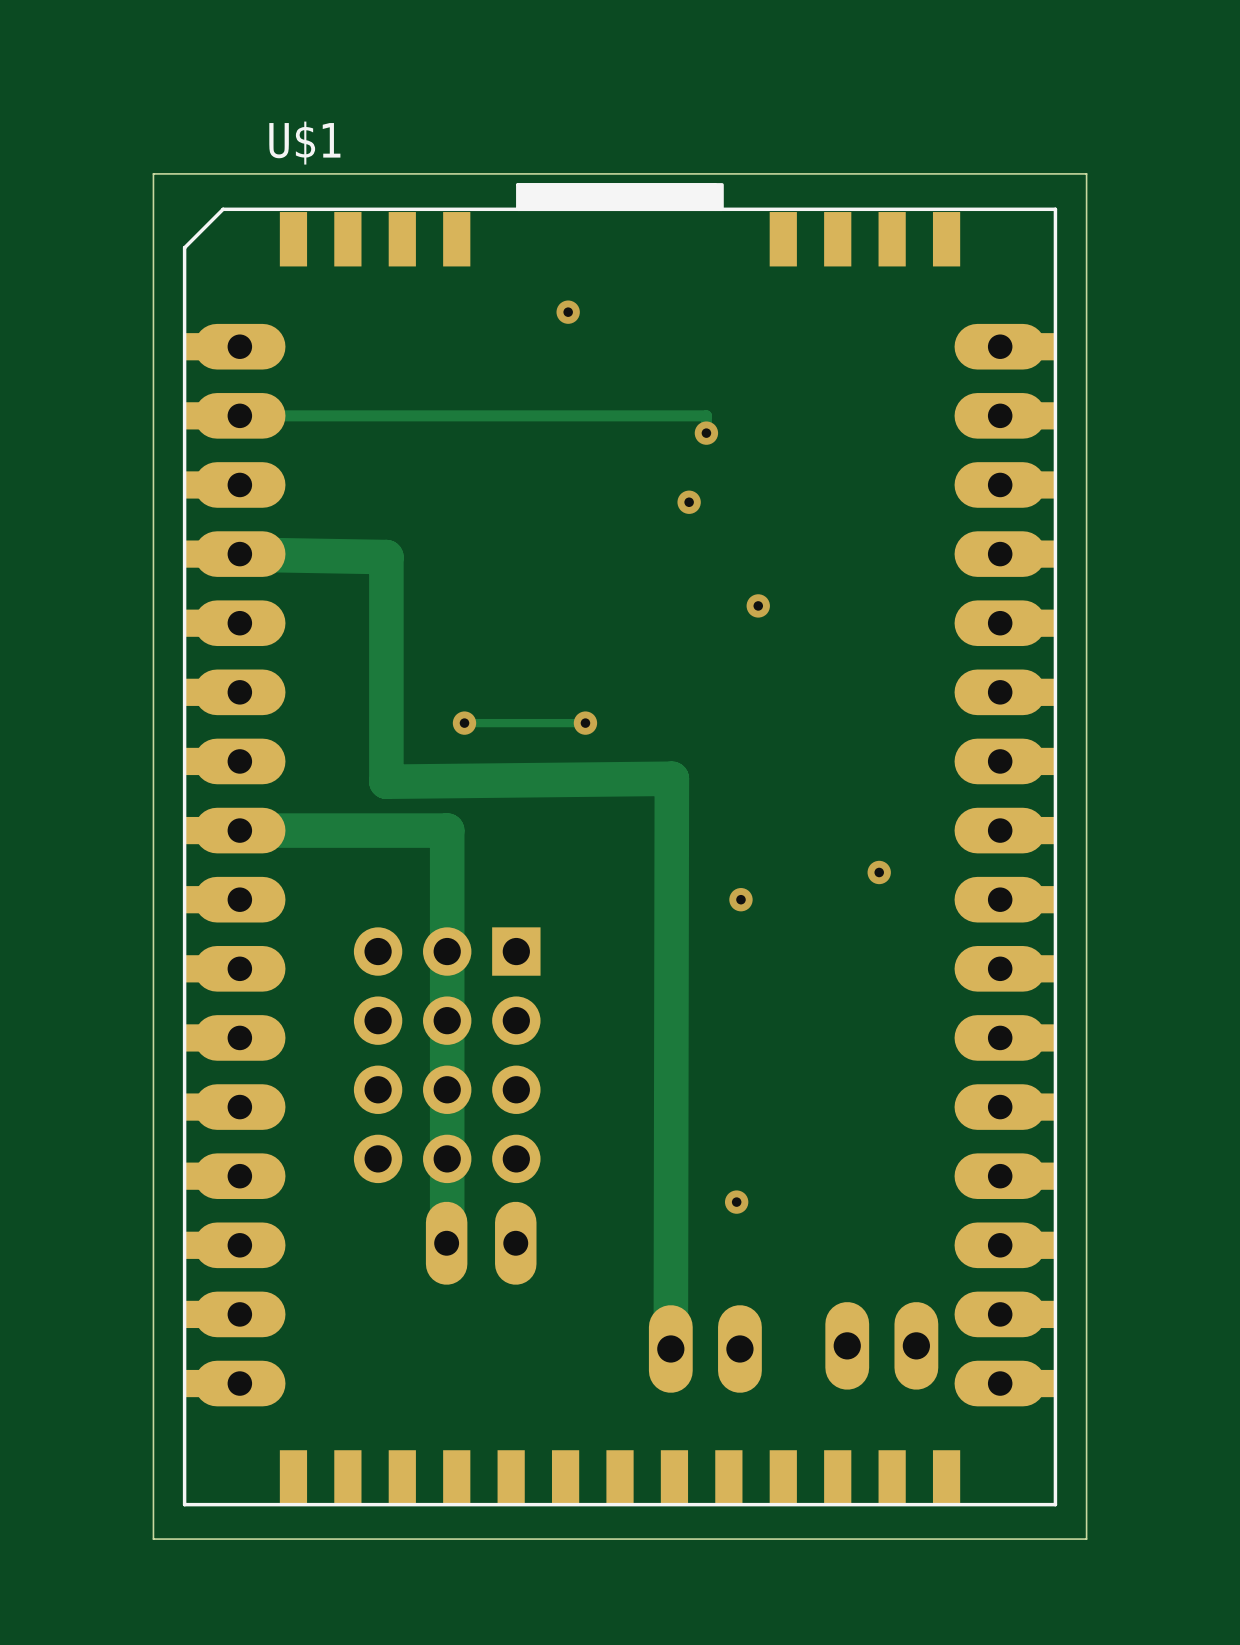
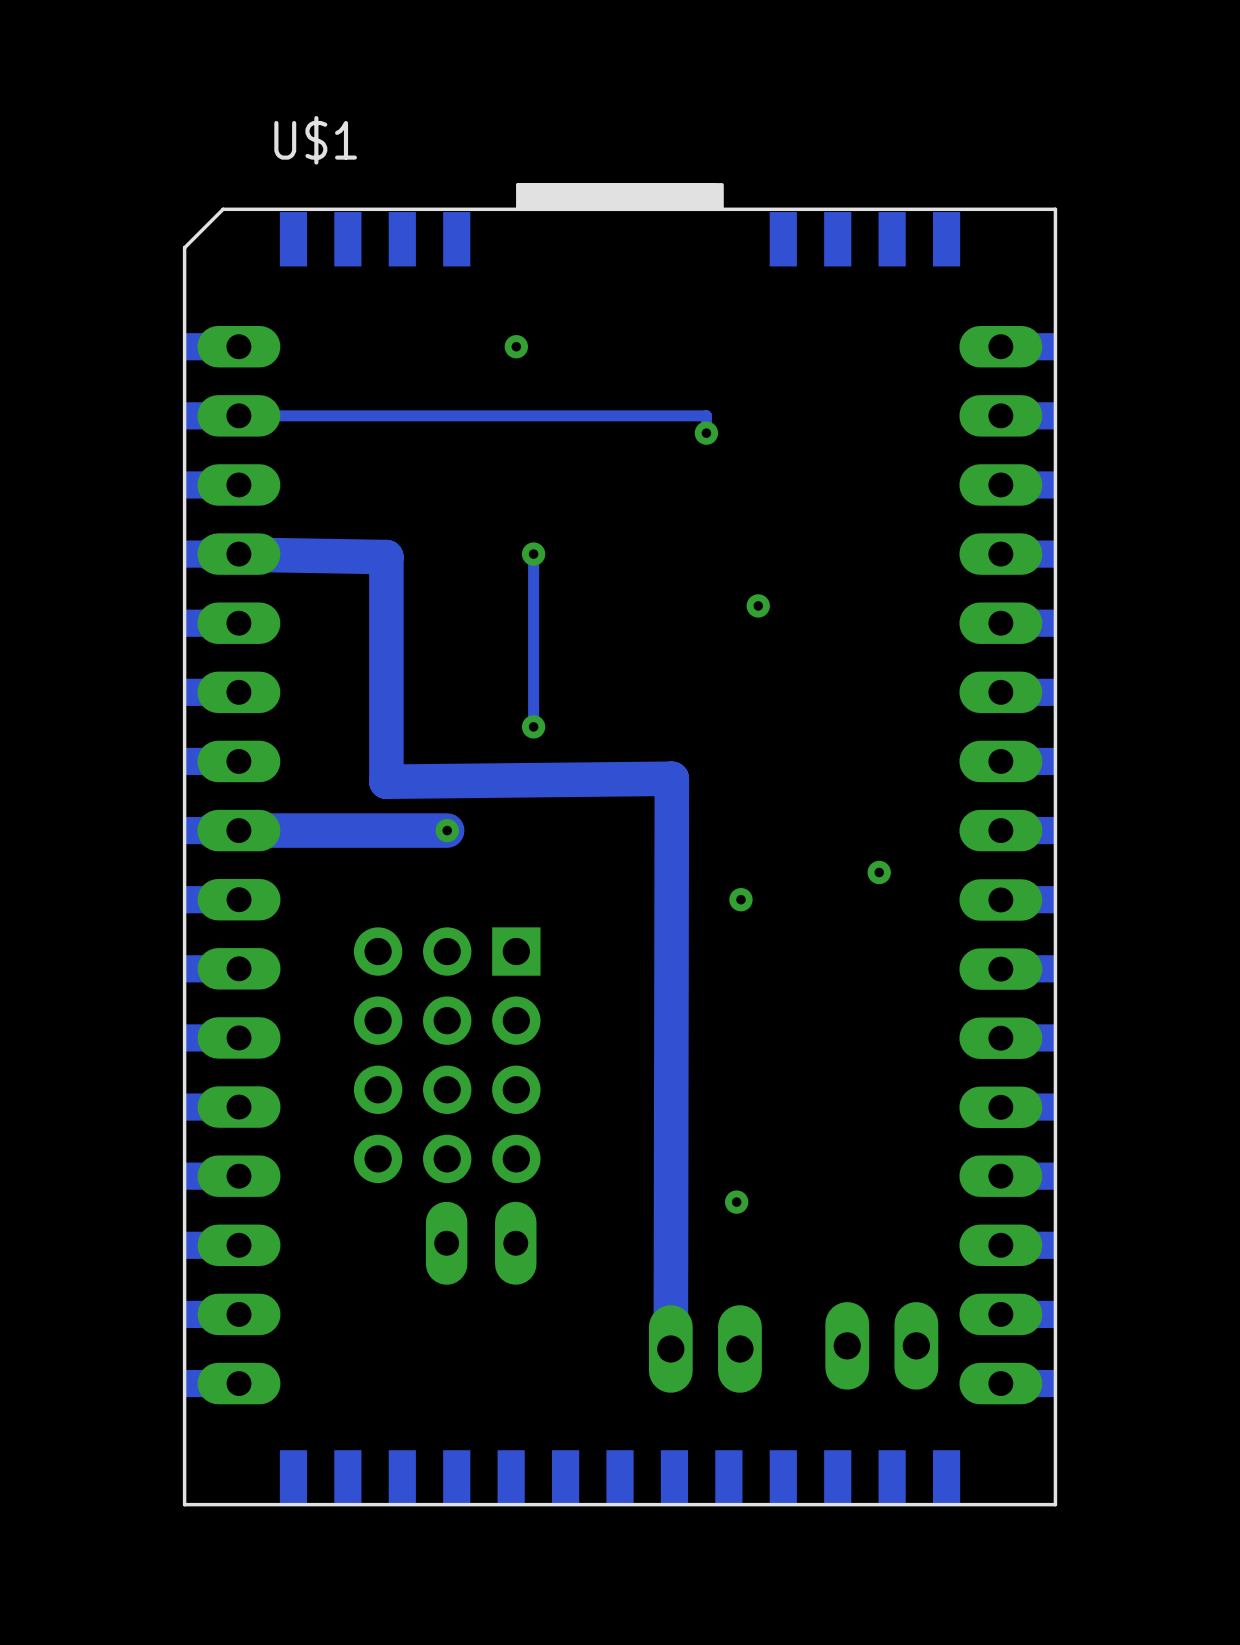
board edge: (1086, 173) (153, 173) (153, 1539) (1086, 1539) (1086, 173) -> none
U$1 footprint: [182, 183, 1058, 1507] -> [182, 183, 1058, 1507]
via position: (568, 312) -> (516, 346)
part: none -> (238, 450)
part: none -> (1000, 450)
via: (689, 502) -> none
track: none -> (533, 554) (533, 726)
via: none -> (533, 554)
via: (464, 723) -> none
track: (585, 723) (464, 723) -> none
via: (585, 723) -> none
part: none -> (238, 726)
via: none -> (533, 726)
part: none -> (1000, 726)
track: (447, 830) (447, 1245) -> none
via: none -> (447, 830)
part: none -> (239, 1003)
part: none -> (1000, 1003)
part: none -> (239, 1279)
part: none -> (1000, 1279)

